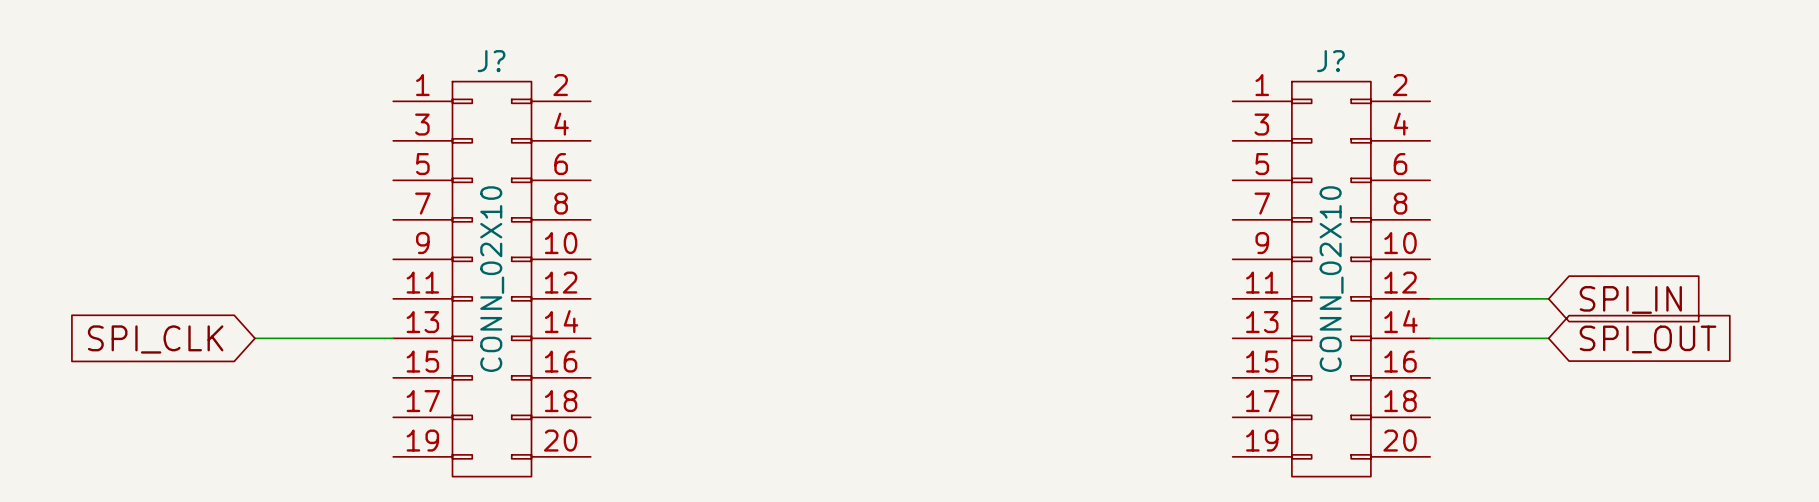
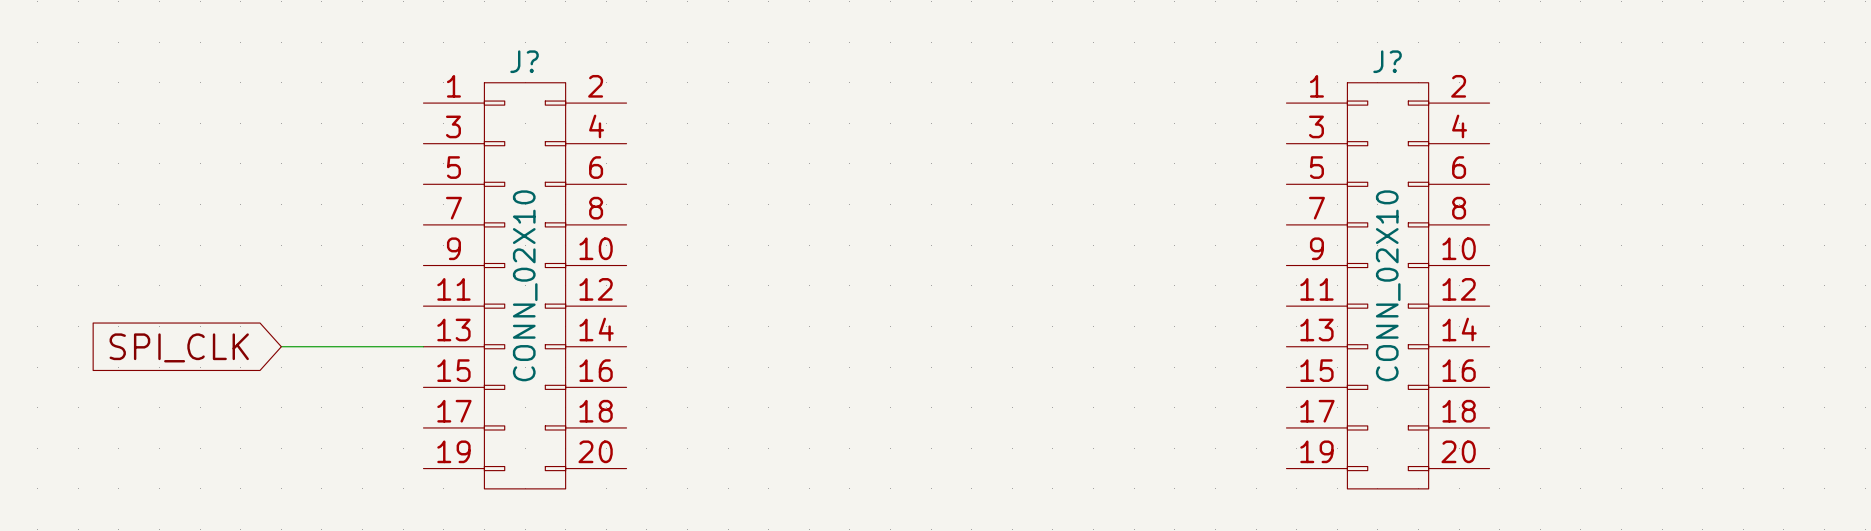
wire: (1430, 298) (1548, 298) -> none
global label: SPI_IN (1630, 299) -> none
wire: (1430, 338) (1548, 338) -> none
global label: SPI_OUT (1648, 339) -> none

